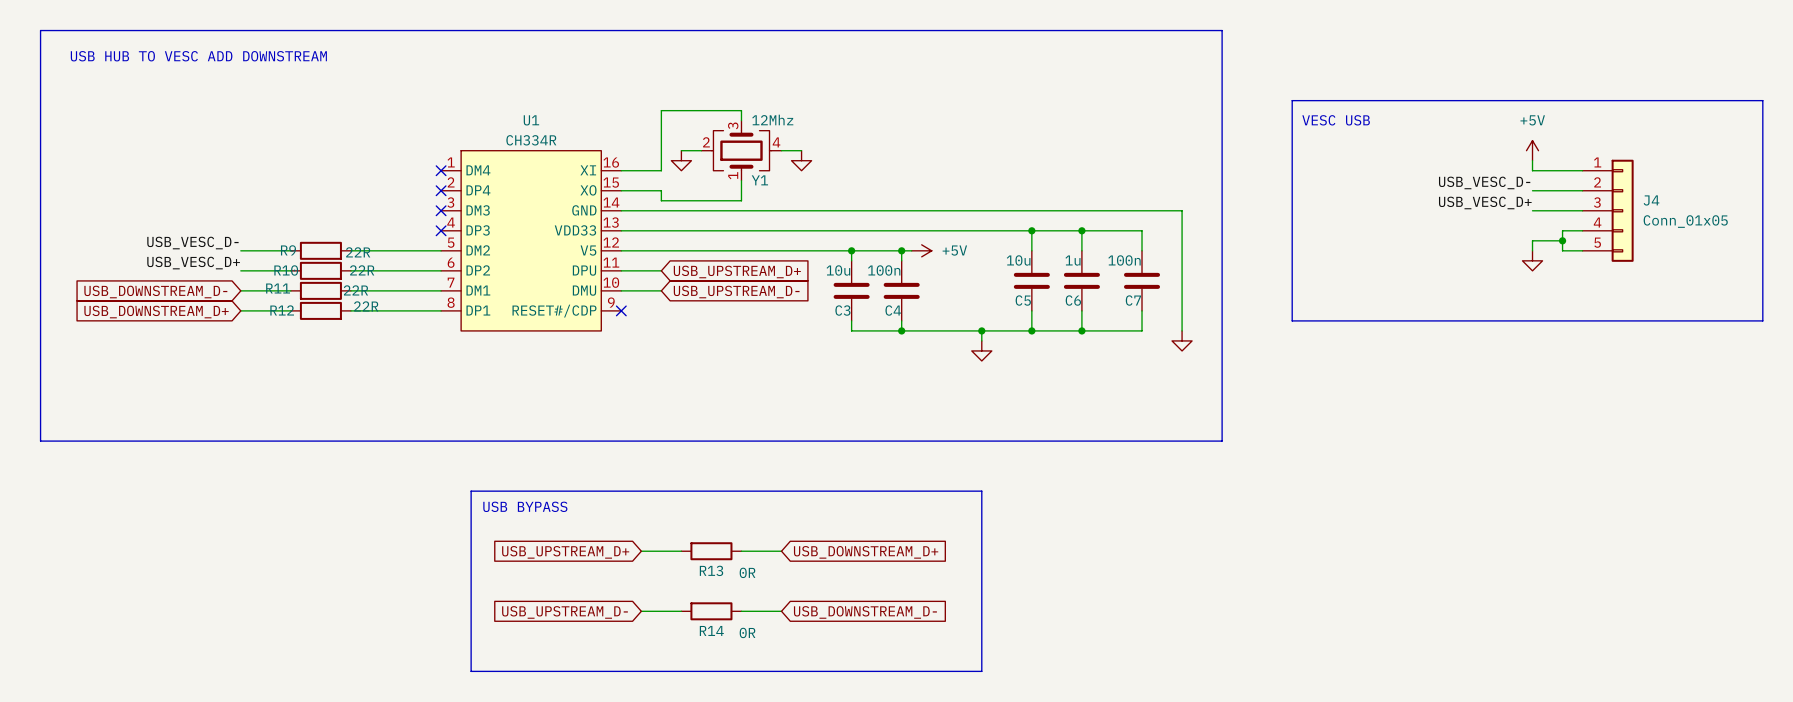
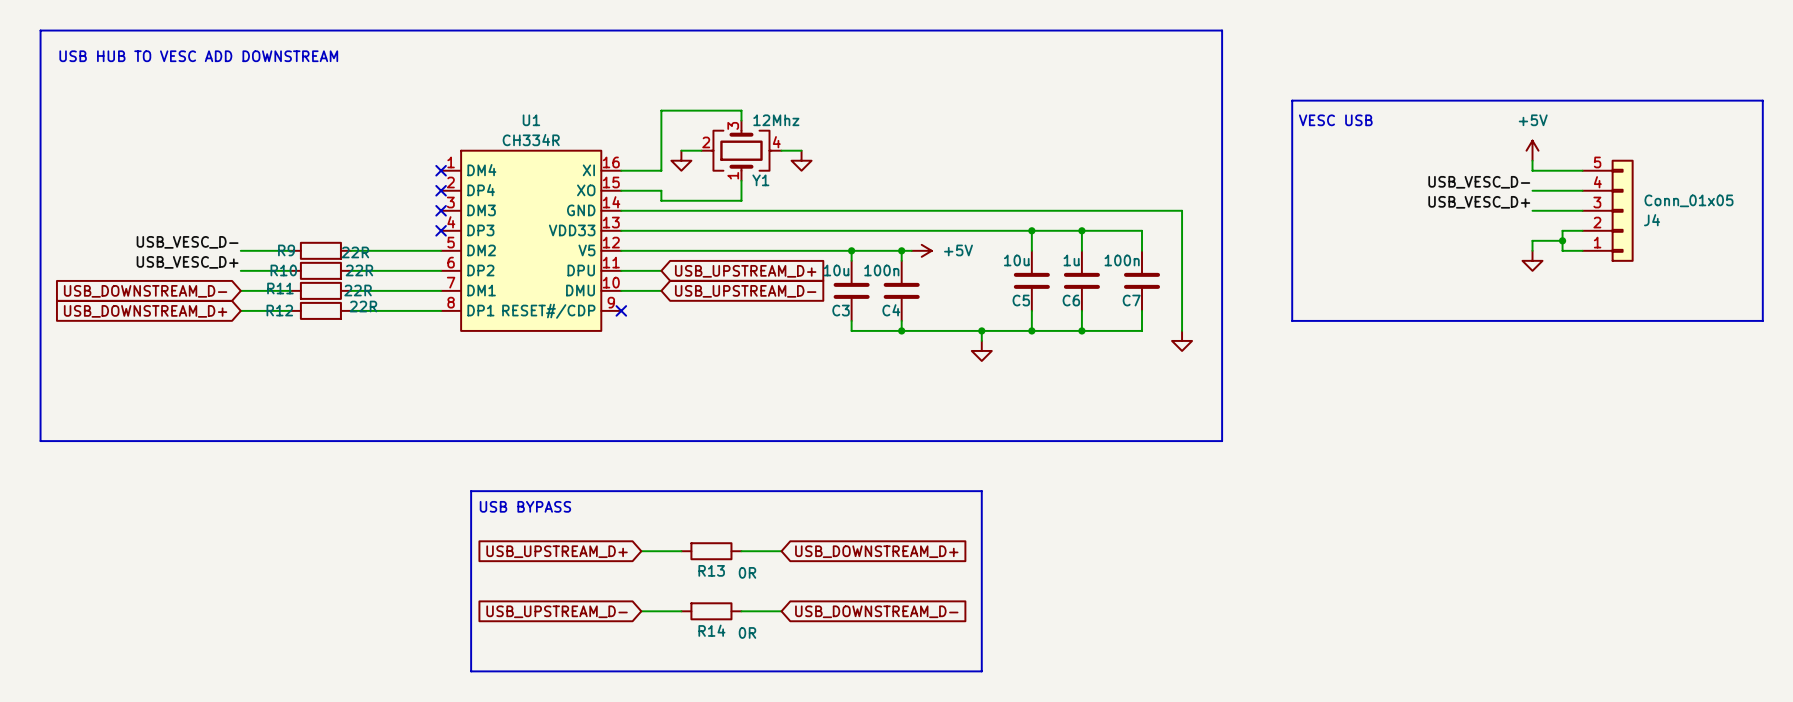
J4 flip: as is (1622, 210) -> up-down (1622, 210)

